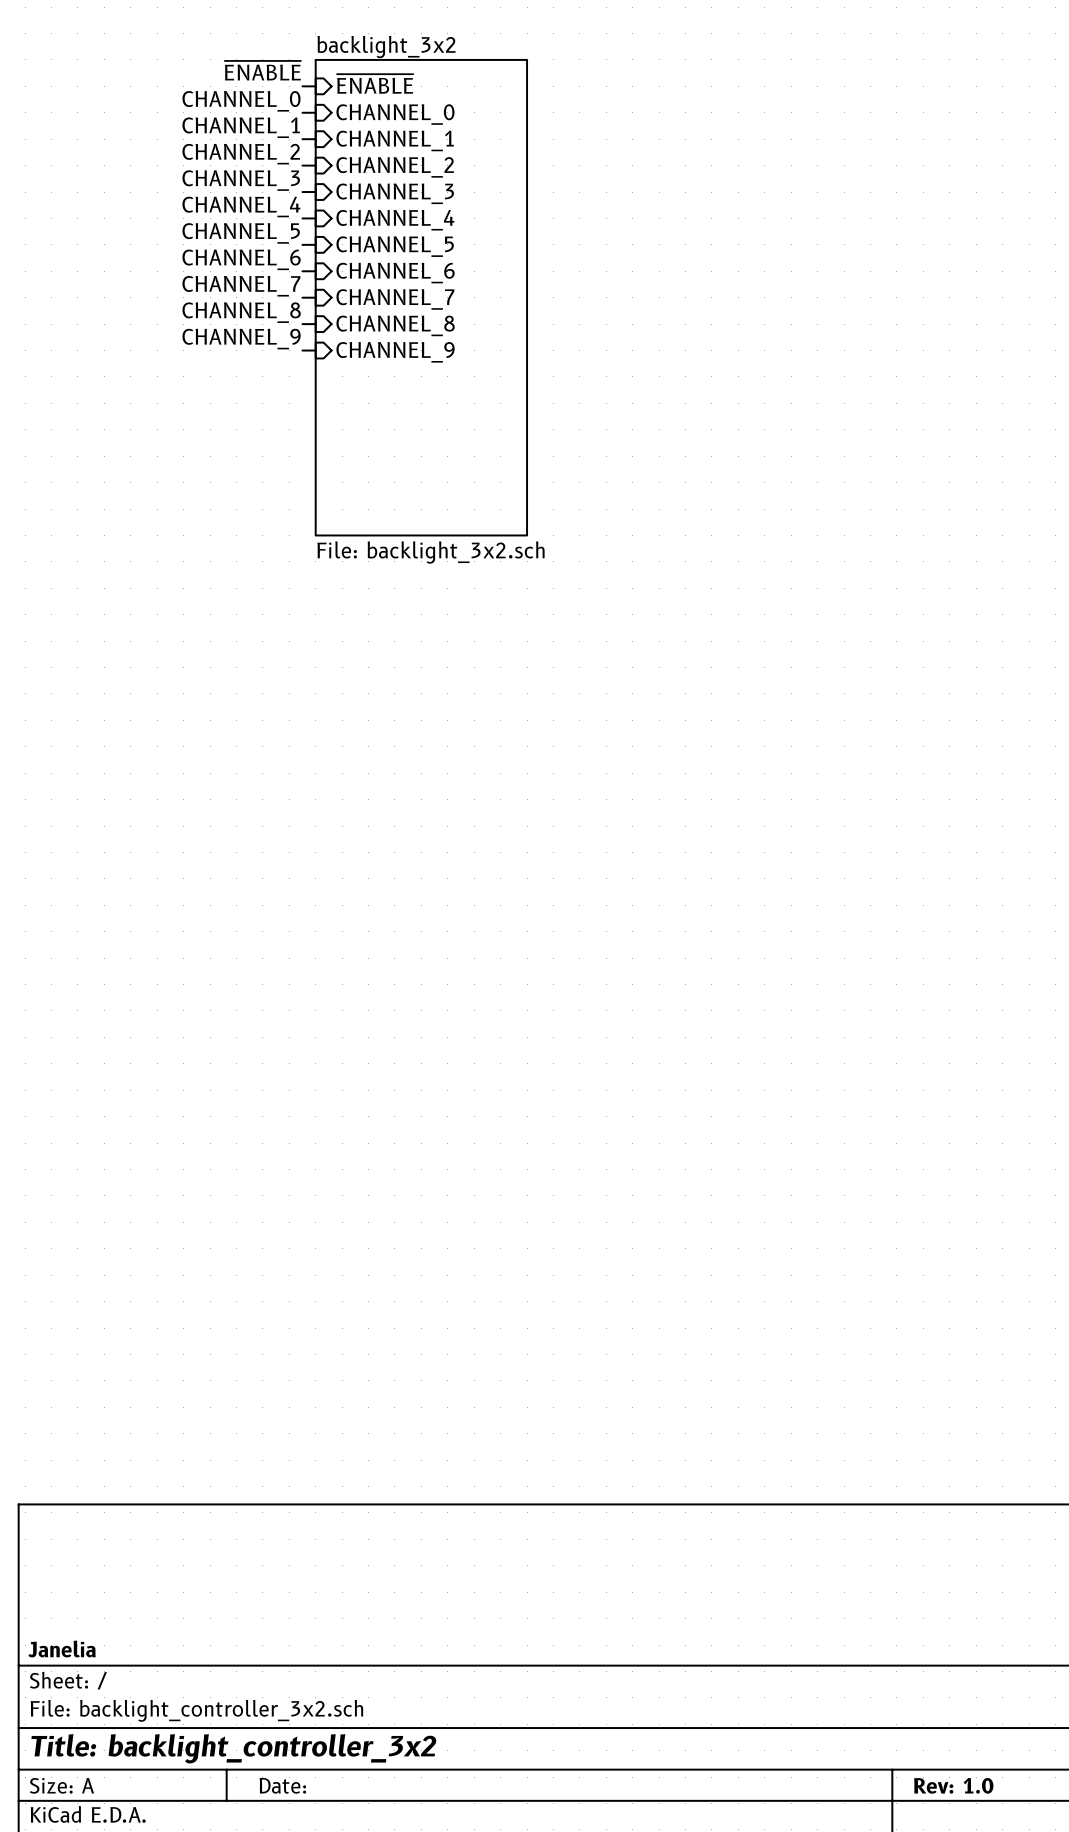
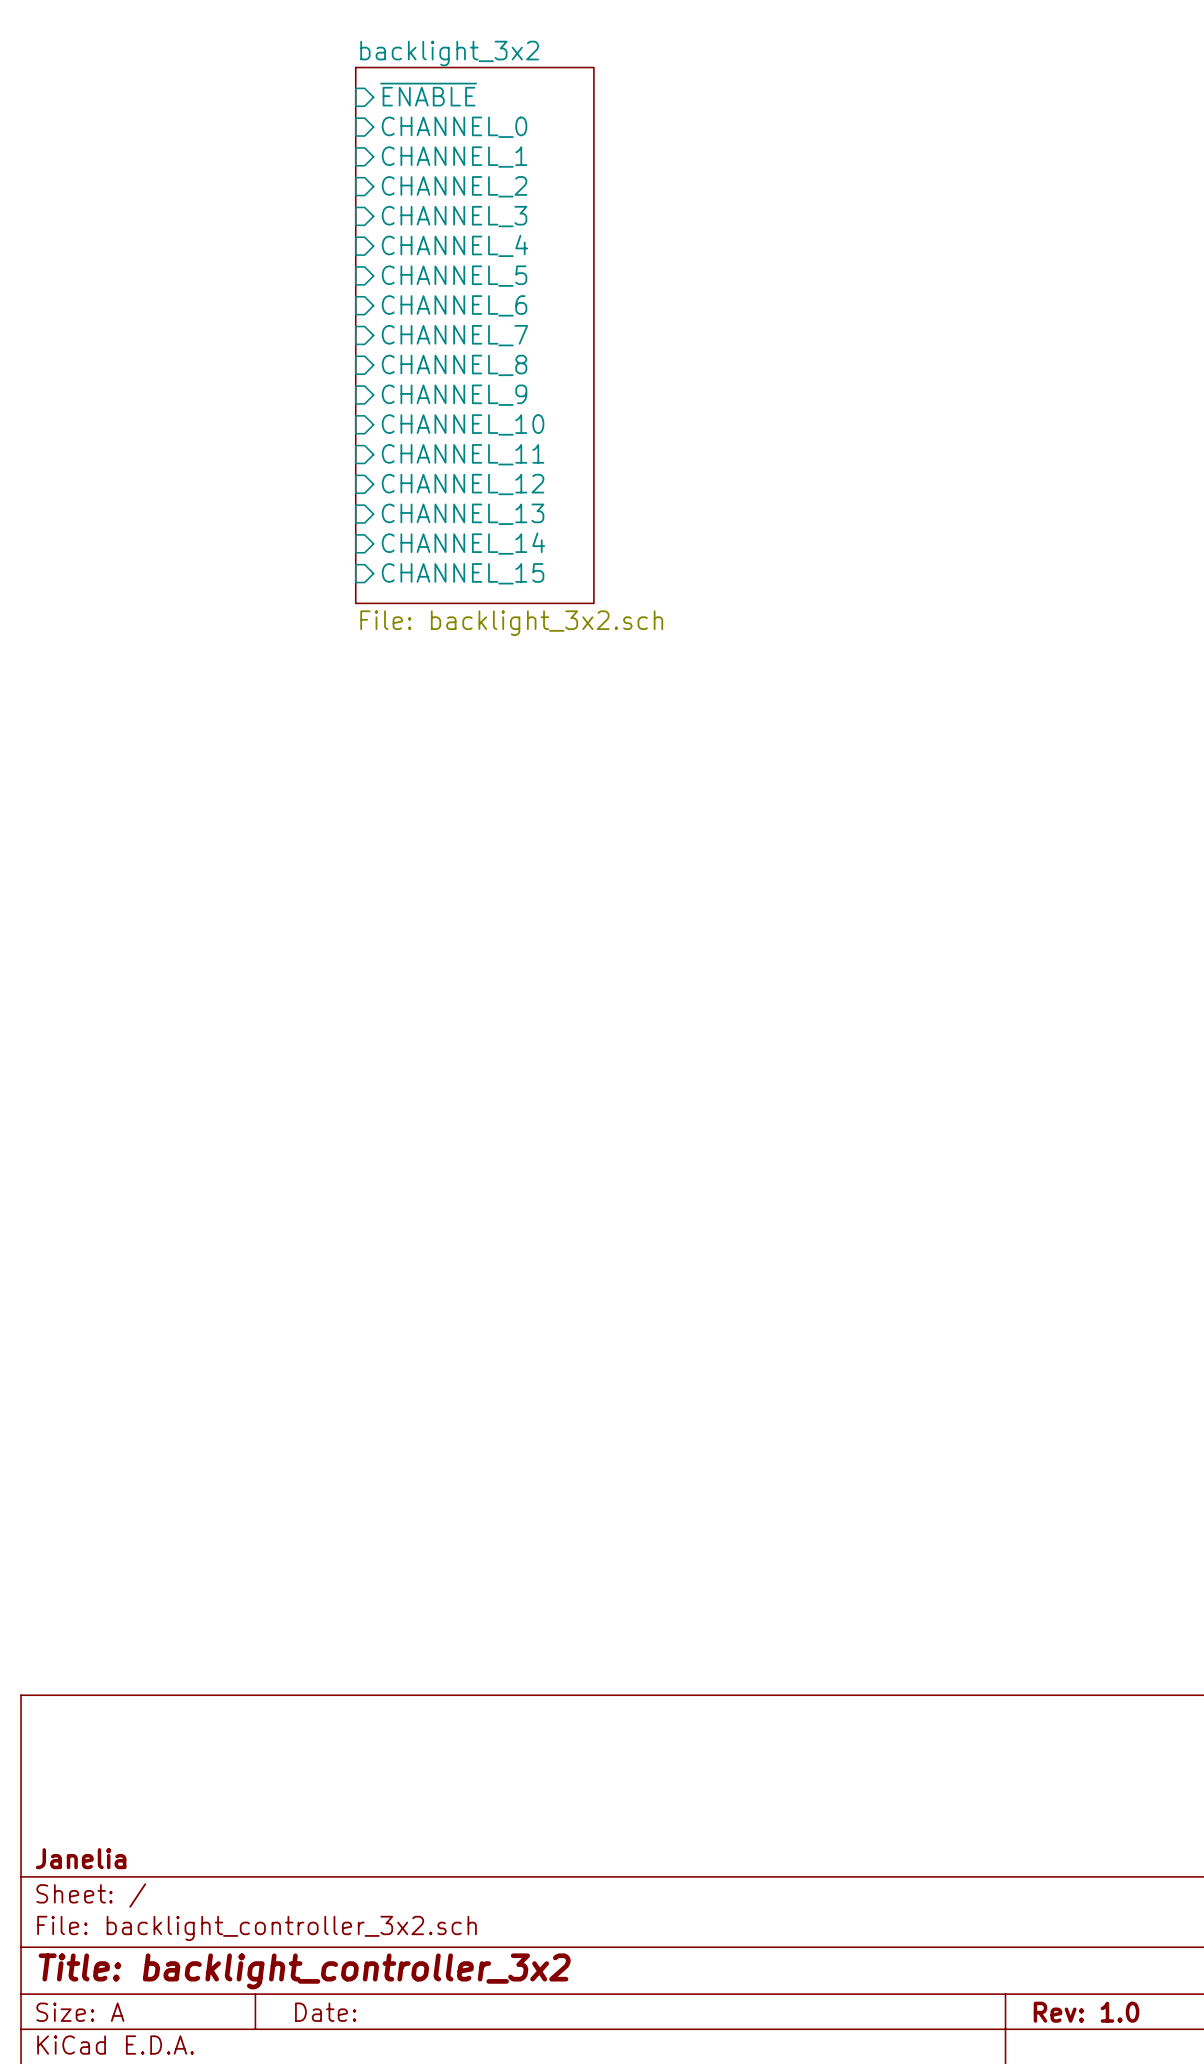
label: ~{ENABLE} (262, 70) -> none
wire: (302, 86) (315, 86) -> none
label: CHANNEL_0 (241, 101) -> none
wire: (302, 112) (315, 112) -> none
label: CHANNEL_1 (241, 127) -> none
wire: (302, 139) (315, 139) -> none
label: CHANNEL_2 (241, 154) -> none
wire: (302, 165) (315, 165) -> none
label: CHANNEL_3 (241, 180) -> none
wire: (302, 192) (315, 192) -> none
label: CHANNEL_4 (241, 206) -> none
wire: (302, 218) (315, 218) -> none
label: CHANNEL_5 (241, 233) -> none
wire: (302, 244) (315, 244) -> none
label: CHANNEL_6 (241, 259) -> none
wire: (302, 271) (315, 271) -> none
label: CHANNEL_7 (241, 286) -> none
wire: (302, 297) (315, 297) -> none
label: CHANNEL_8 (241, 312) -> none
wire: (302, 324) (315, 324) -> none
label: CHANNEL_9 (241, 339) -> none
wire: (302, 350) (315, 350) -> none
sheet pin: none -> CHANNEL_10 (463, 424)
sheet pin: none -> CHANNEL_11 (463, 454)
sheet pin: none -> CHANNEL_12 (463, 484)
sheet pin: none -> CHANNEL_13 (463, 514)
sheet pin: none -> CHANNEL_14 (463, 543)
sheet pin: none -> CHANNEL_15 (463, 573)

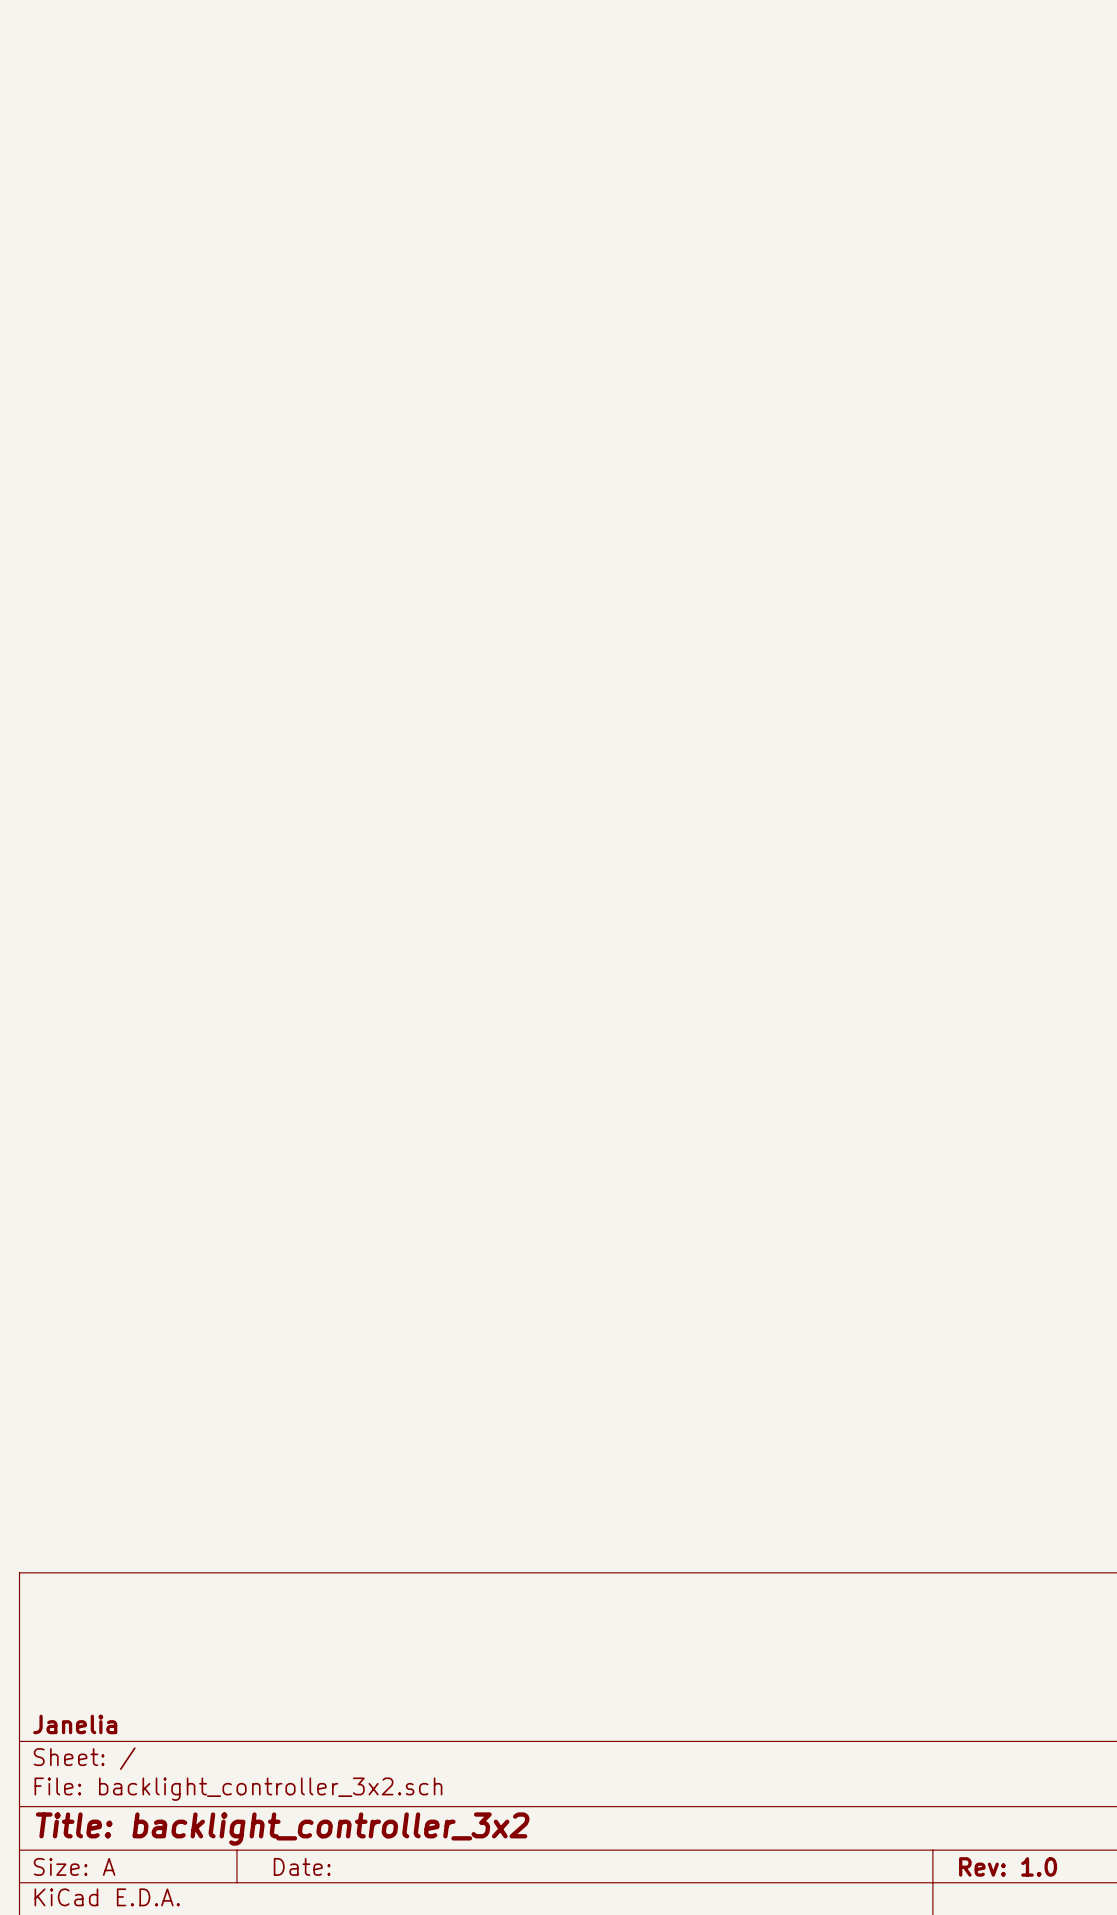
sheet pin: ~{ENABLE} (428, 94) -> none
sheet pin: CHANNEL_0 (454, 127) -> none
sheet pin: CHANNEL_1 (454, 157) -> none
sheet pin: CHANNEL_2 (454, 186) -> none
sheet pin: CHANNEL_3 (454, 216) -> none
sheet pin: CHANNEL_4 (454, 245) -> none
sheet pin: CHANNEL_5 (454, 276) -> none
sheet pin: CHANNEL_6 (454, 305) -> none
sheet pin: CHANNEL_7 (454, 335) -> none
sheet backlight_3x2: File: backlight_3x2.sch (474, 335) -> none
sheet pin: CHANNEL_8 (454, 365) -> none
sheet pin: CHANNEL_9 (454, 395) -> none
sheet pin: CHANNEL_10 (463, 424) -> none
sheet pin: CHANNEL_11 (463, 454) -> none
sheet pin: CHANNEL_12 (463, 484) -> none
sheet pin: CHANNEL_13 (463, 514) -> none
sheet pin: CHANNEL_14 (463, 543) -> none
sheet pin: CHANNEL_15 (463, 573) -> none

